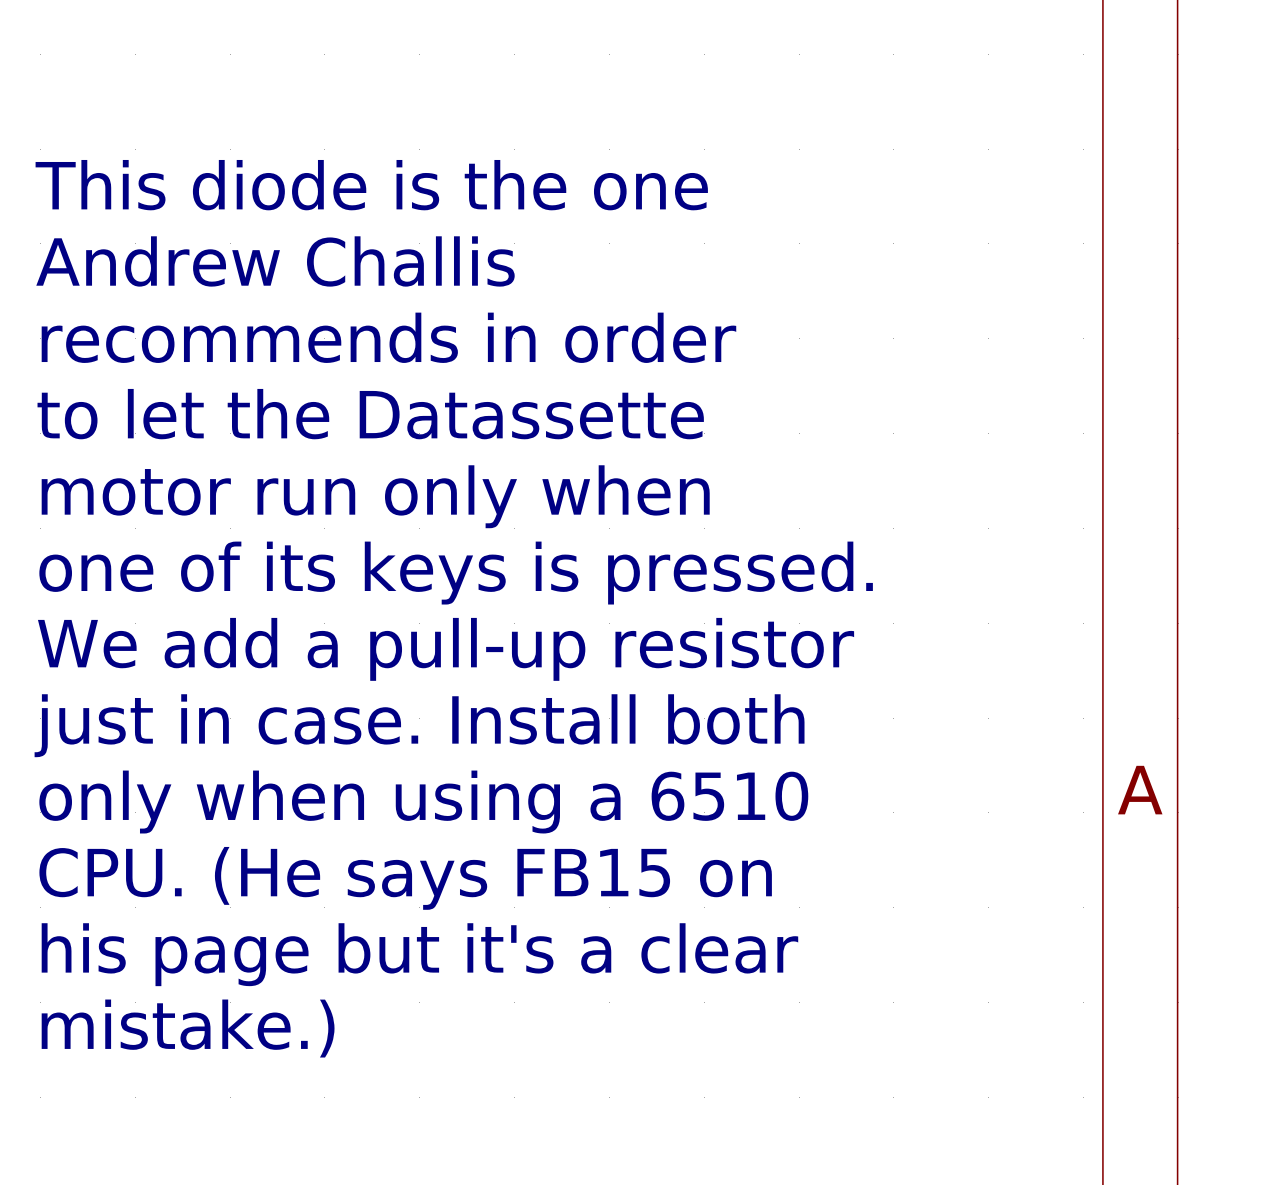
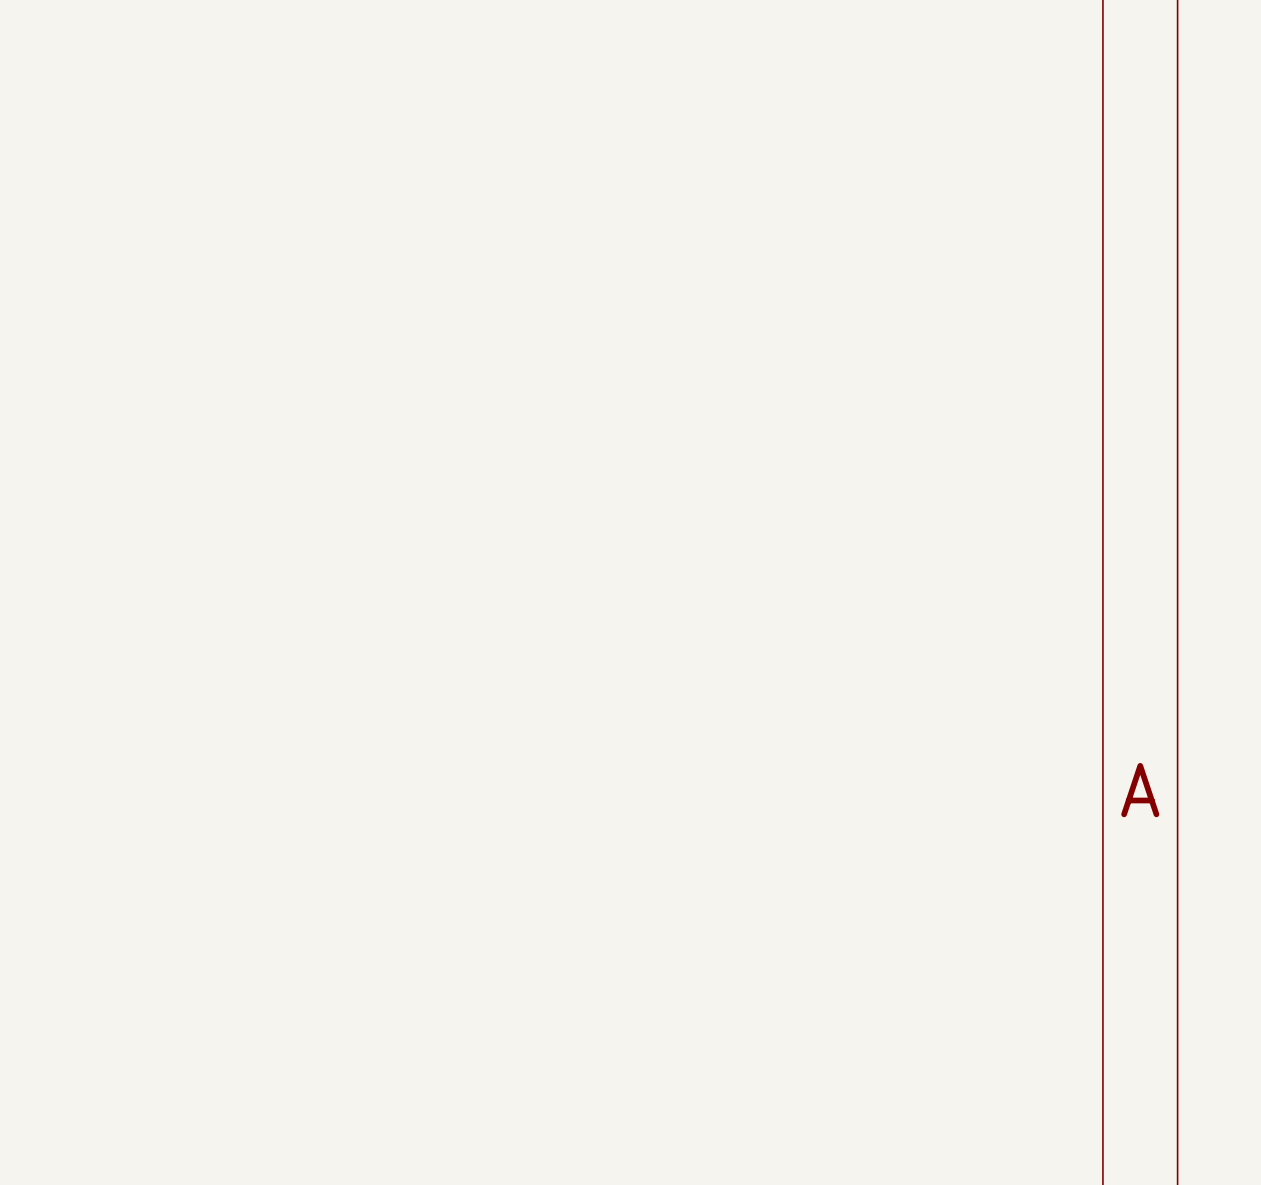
text: This diode is the one (371, 185) -> none
text: Andrew Challis (275, 261) -> none
text: recommends in order (388, 337) -> none
text: to let the Datassette (370, 414) -> none
text: motor run only when (375, 496) -> none
text: one of its keys is pressed. (456, 573) -> none
text: We add a pull-up resistor (446, 649) -> none
text: just in case. Install both (419, 725) -> none
text: only when using a 6510 (423, 802) -> none
text: CPU. (He says FB15 on (405, 878) -> none
text: his page but it's a clear (419, 954) -> none
text: mistake.) (188, 1028) -> none

